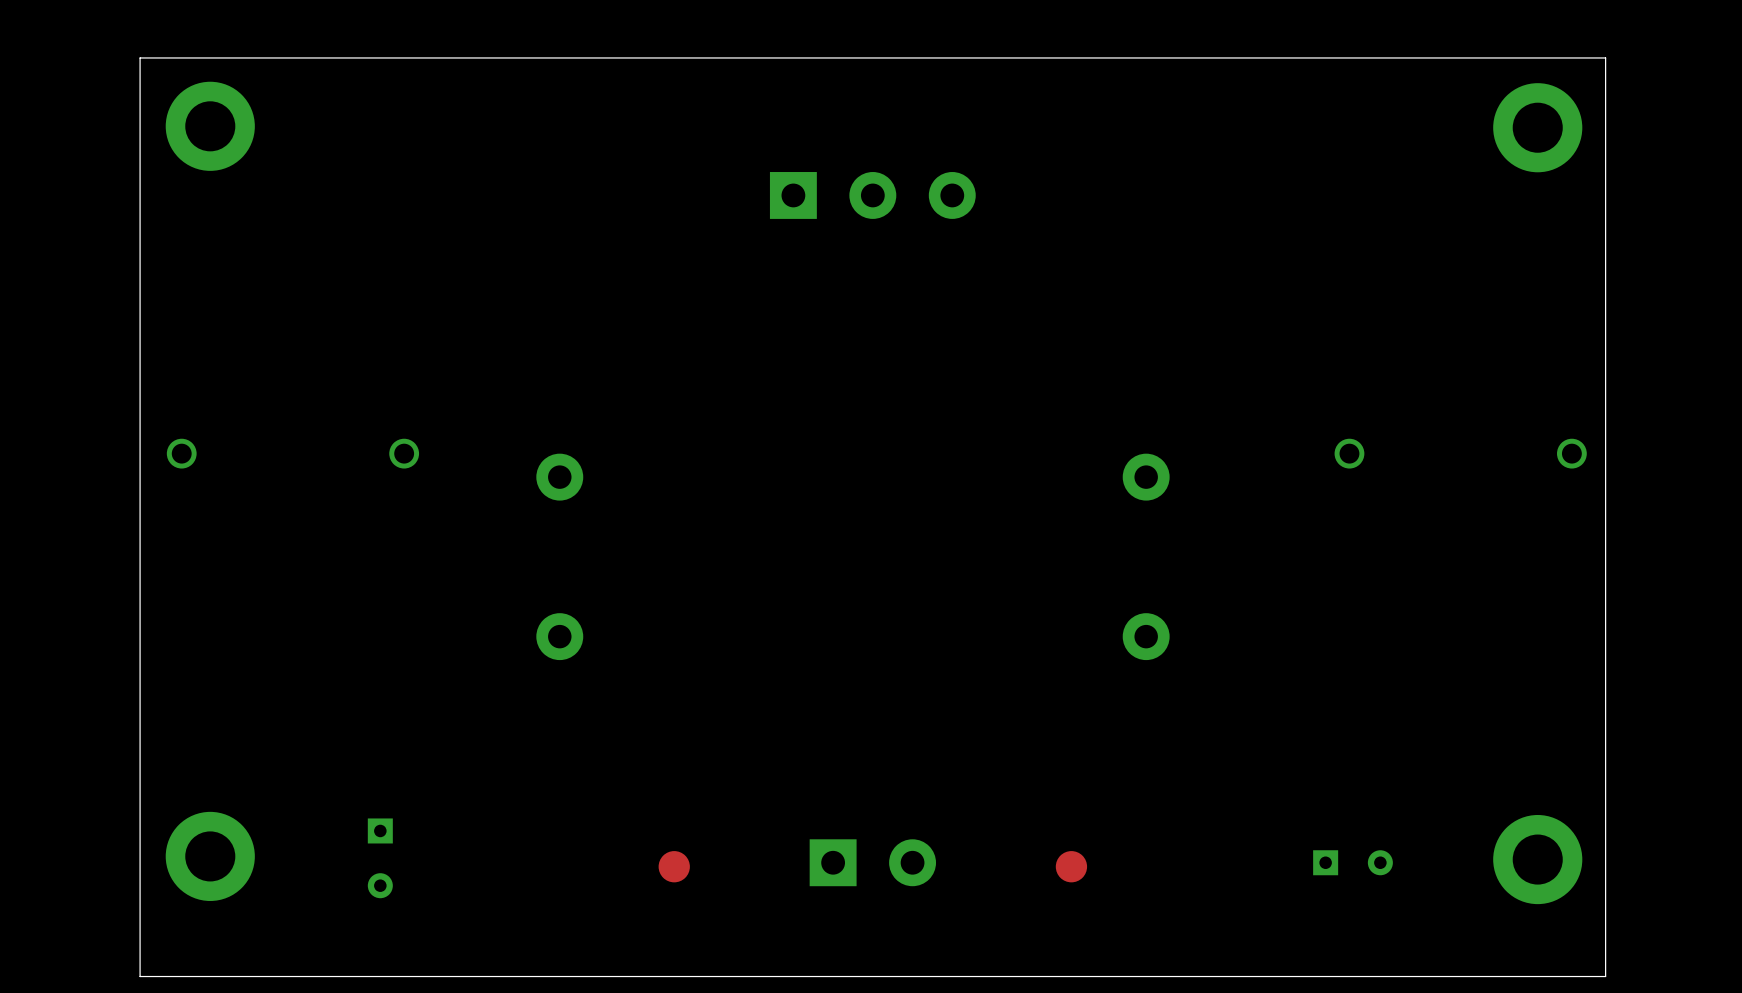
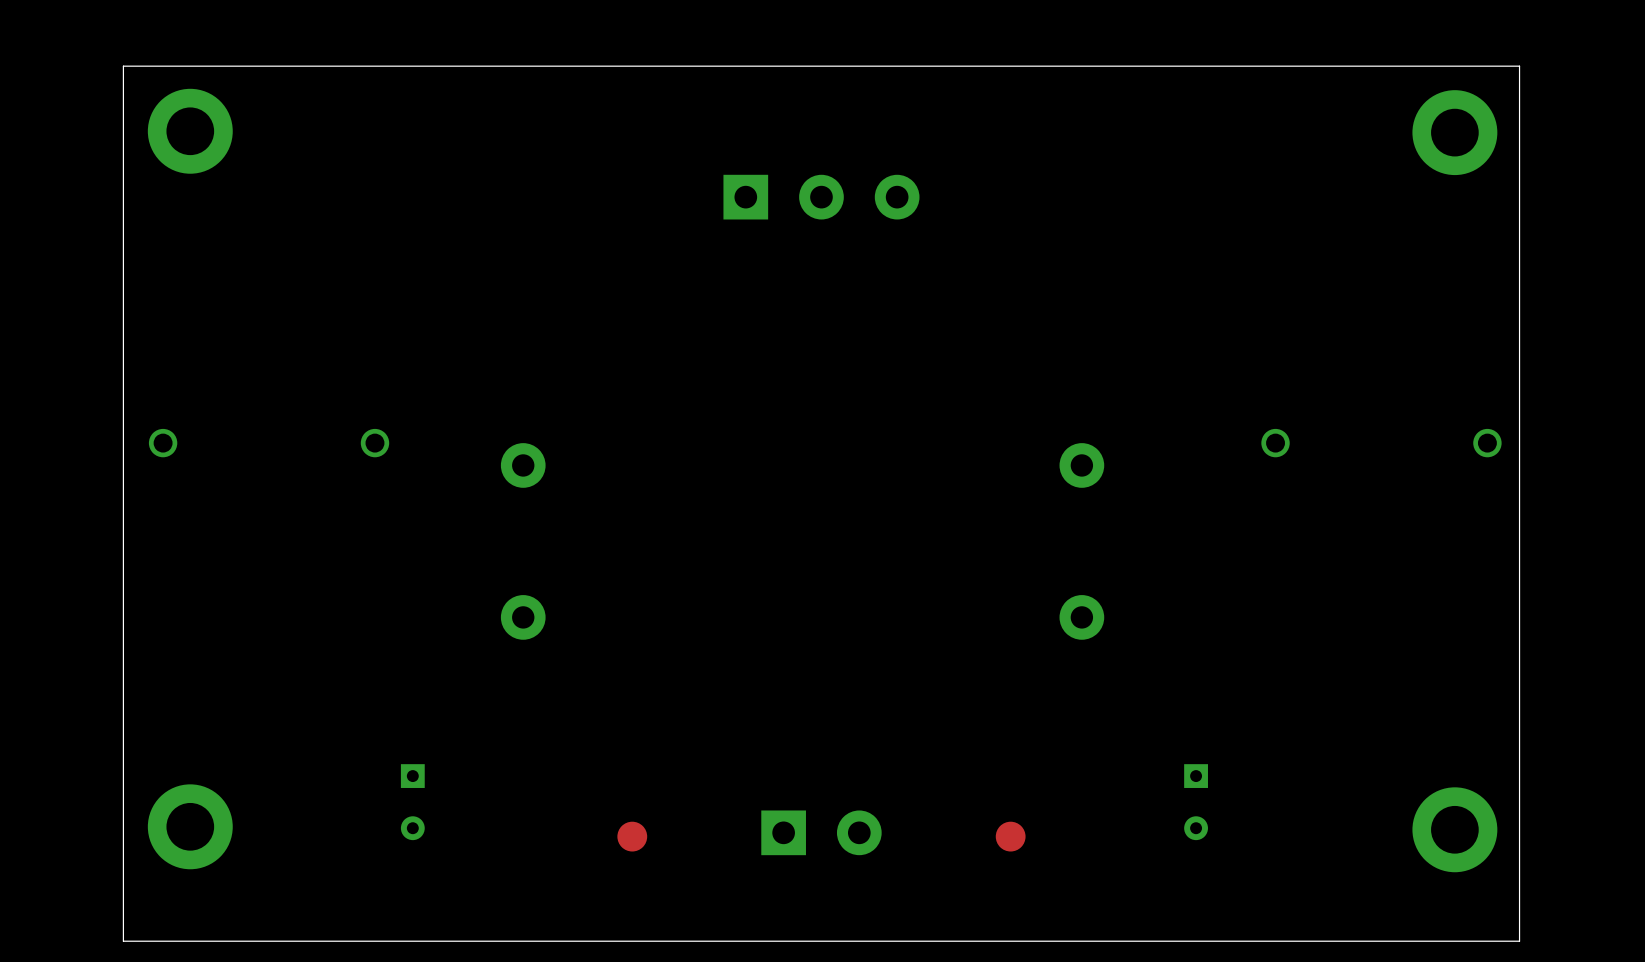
part position: (380, 858) -> (412, 802)
part rotation: 0° (1353, 862) -> 90° clockwise (1196, 802)
part position: (1353, 862) -> (1196, 802)

